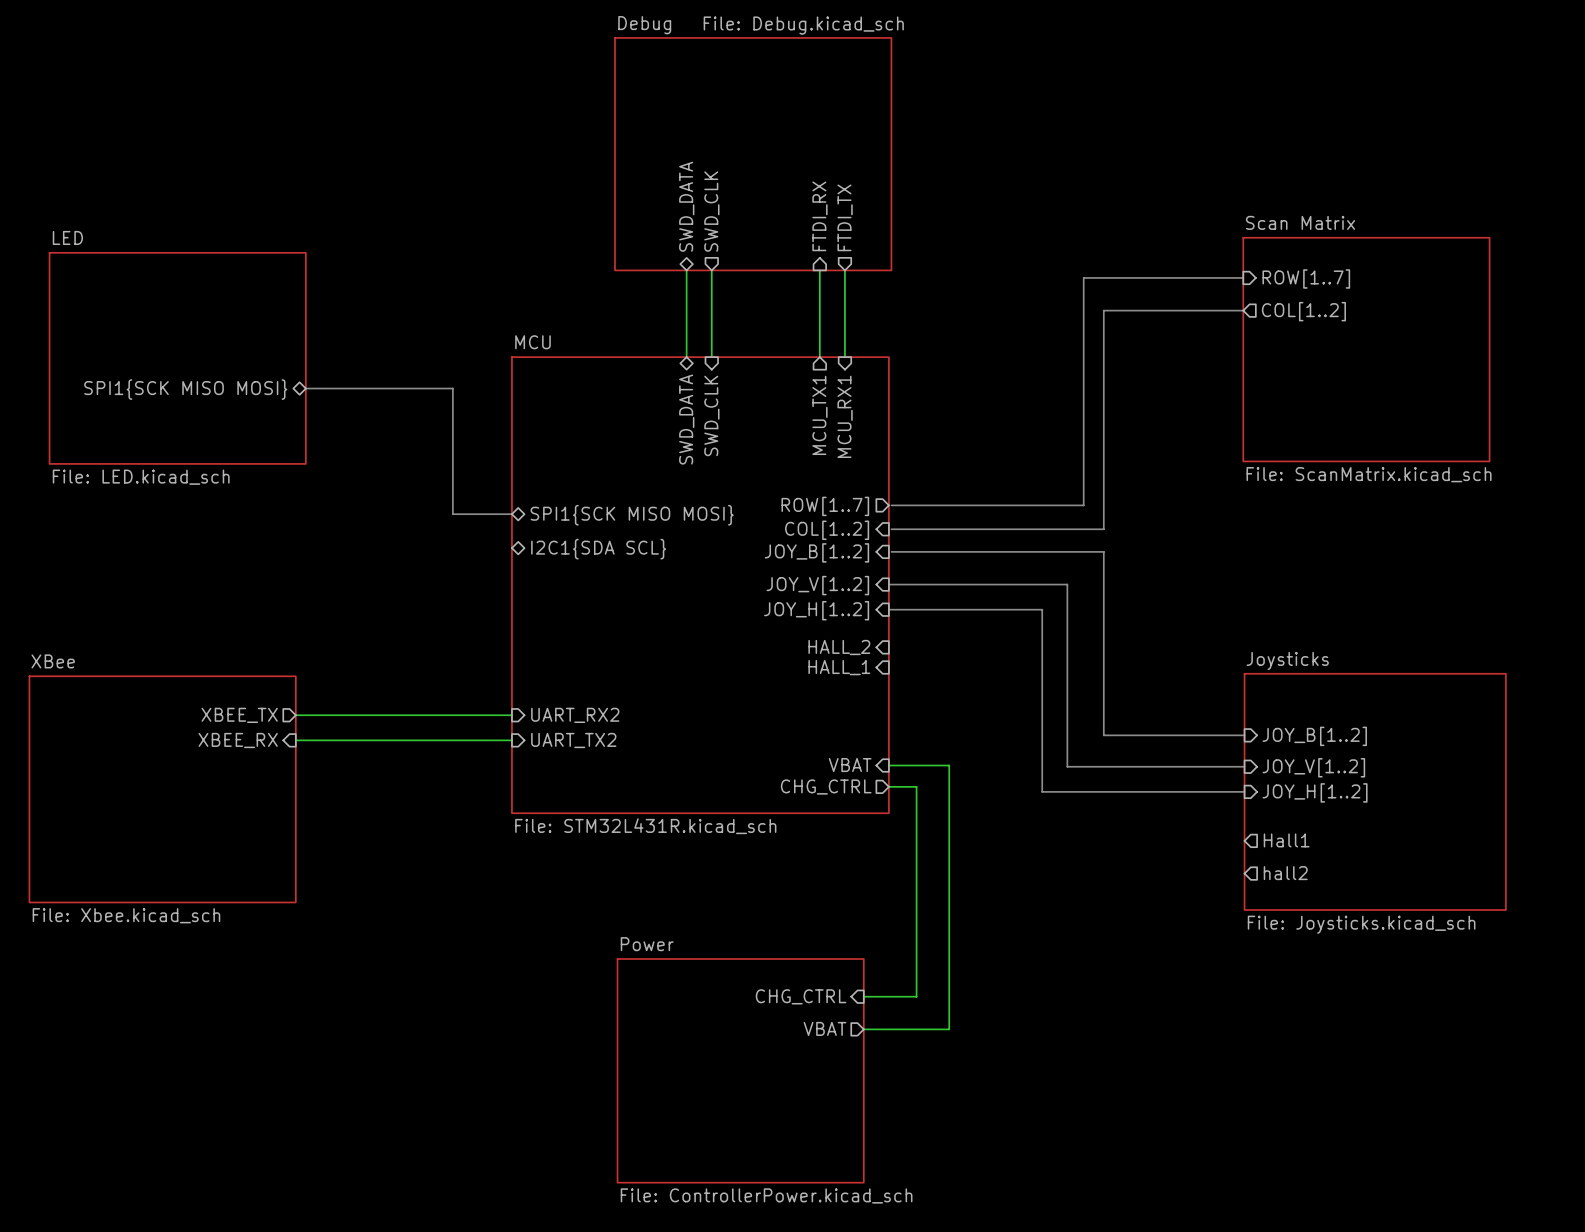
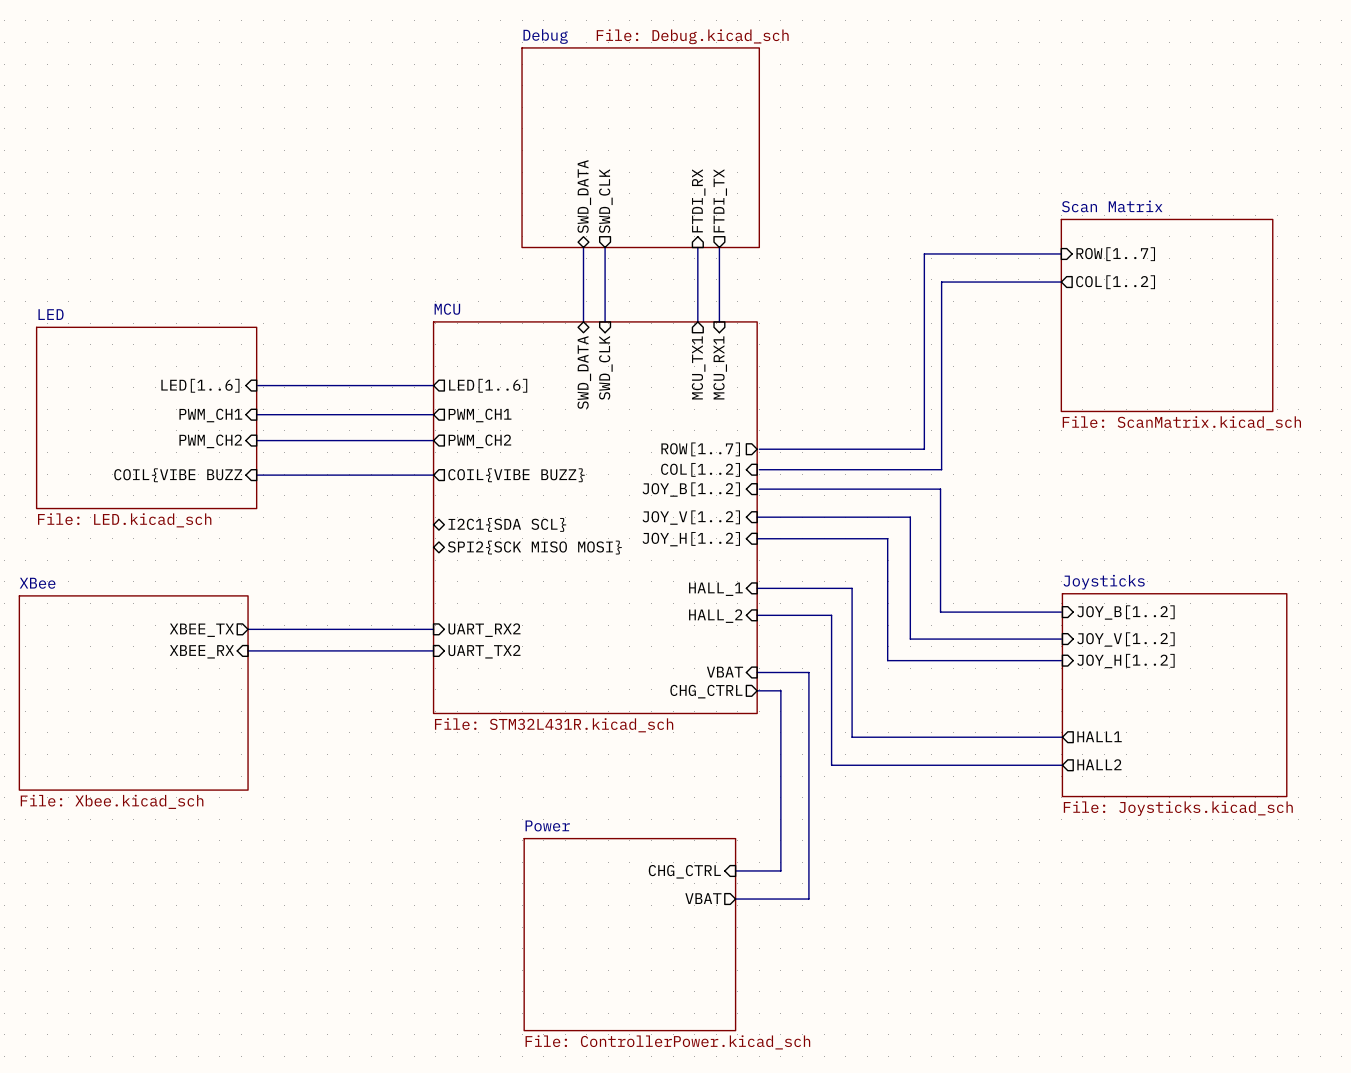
sheet LED position: (177, 358) -> (146, 417)
bus: (305, 388) (452, 388) (452, 514) (511, 514) -> none
sheet pin: SPI1{SCK MISO MOSI} (185, 389) -> none
bus: none -> (257, 385) (433, 385)
sheet pin: none -> LED[1..6] (200, 385)
sheet pin: none -> LED[1..6] (488, 385)
sheet pin: none -> PWM_CH1 (210, 415)
wire: none -> (256, 414) (433, 414)
sheet pin: none -> PWM_CH1 (480, 415)
sheet pin: none -> PWM_CH2 (210, 441)
wire: none -> (256, 440) (433, 440)
sheet pin: none -> PWM_CH2 (479, 441)
sheet pin: SPI1{SCK MISO MOSI} (632, 515) -> none
bus: none -> (256, 475) (433, 475)
sheet pin: none -> COIL{VIBE BUZZ (178, 475)
sheet pin: none -> COIL{VIBE BUZZ} (516, 475)
sheet pin position: I2C1{SDA SCL} (598, 549) -> I2C1{SDA SCL} (507, 524)
bus: (1102, 551) (1103, 735) (1244, 735) -> (940, 489) (940, 612) (1061, 612)
bus: (1040, 609) (1042, 791) (1244, 791) -> (887, 538) (887, 660) (1061, 660)
sheet pin: none -> SPI2{SCK MISO MOSI} (534, 547)
sheet pin position: HALL_2 (839, 647) -> HALL_2 (715, 616)
wire: none -> (757, 588) (852, 588) (852, 737) (1062, 737)
wire: none -> (757, 615) (831, 615) (831, 765) (1062, 765)
bus: (1067, 726) (1067, 766) (1244, 766) -> (910, 639) (1061, 639)
sheet pin position: JOY_B[1..2] (1314, 736) -> JOY_B[1..2] (1125, 612)
sheet pin position: JOY_V[1..2] (1313, 767) -> JOY_V[1..2] (1125, 639)
sheet pin position: JOY_H[1..2] (1315, 792) -> JOY_H[1..2] (1125, 661)
sheet pin: Hall1 (1286, 840) -> HALL1 (1099, 736)
sheet pin: hall2 (1285, 873) -> HALL2 (1099, 764)

